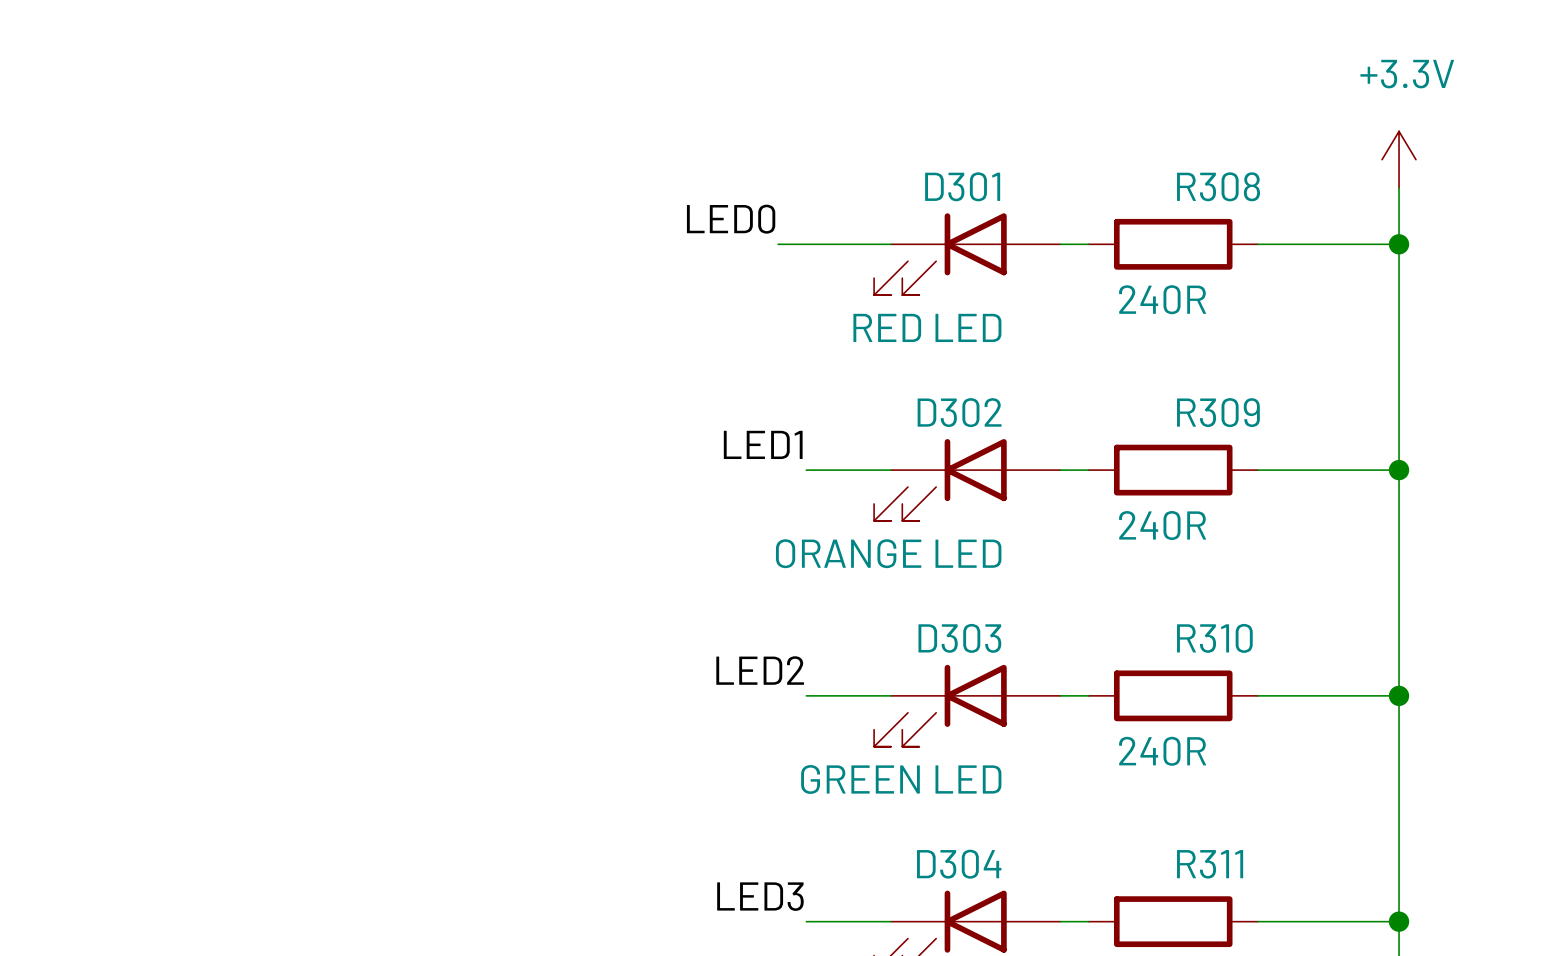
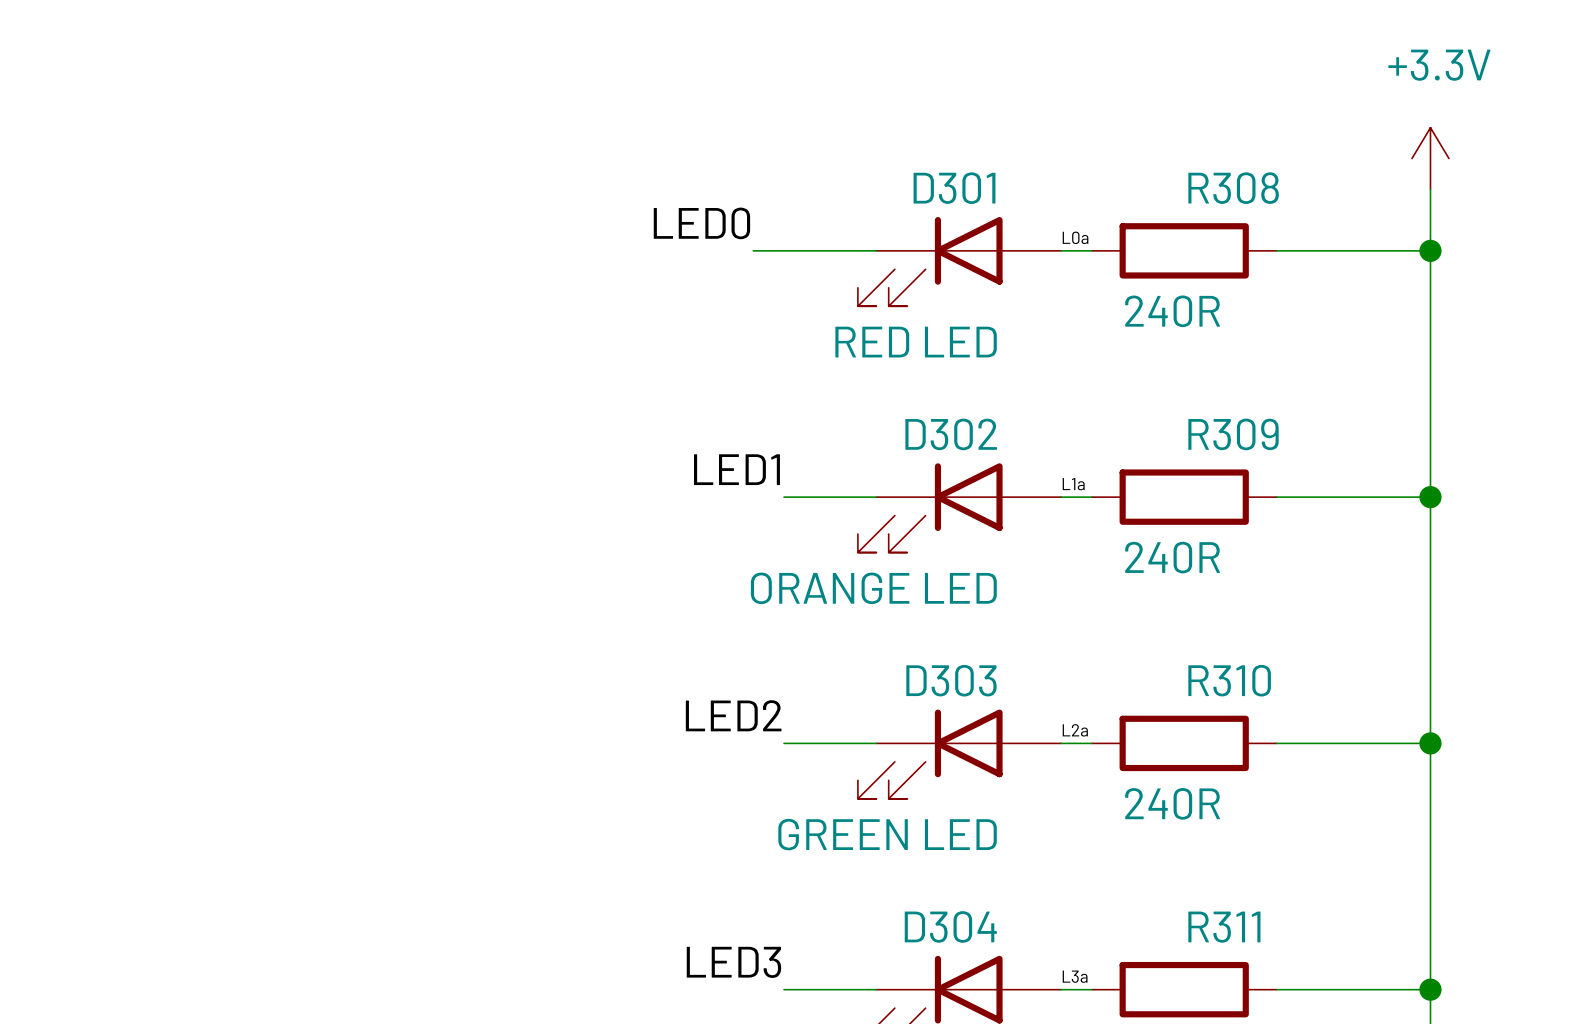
label: none -> L0a (1075, 237)
label: none -> L1a (1073, 484)
label: none -> L2a (1075, 730)
label: none -> L3a (1075, 976)

